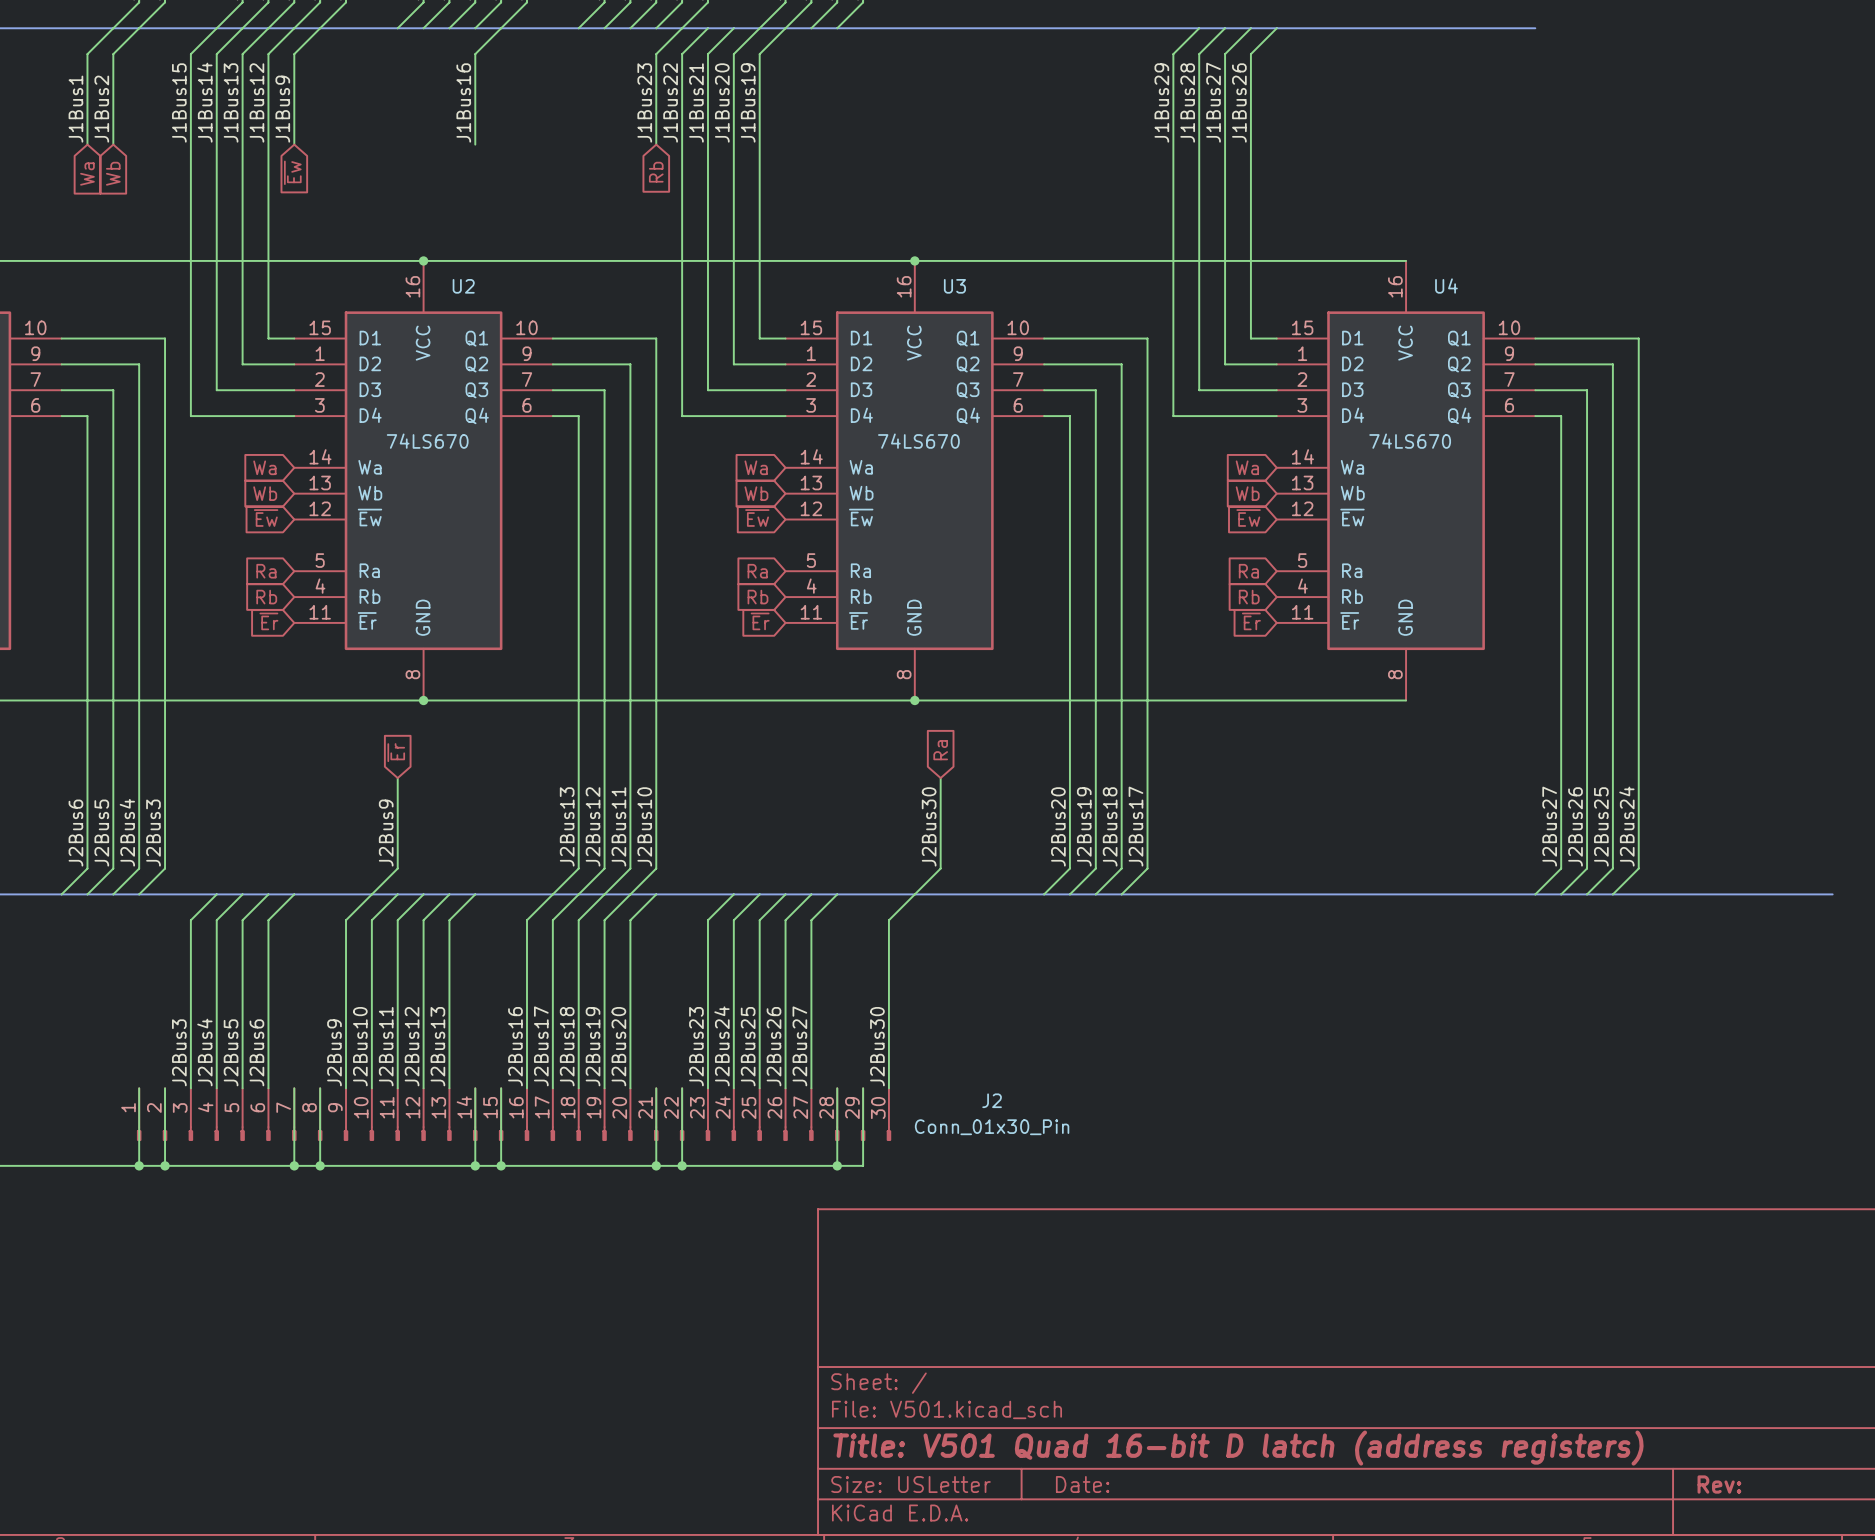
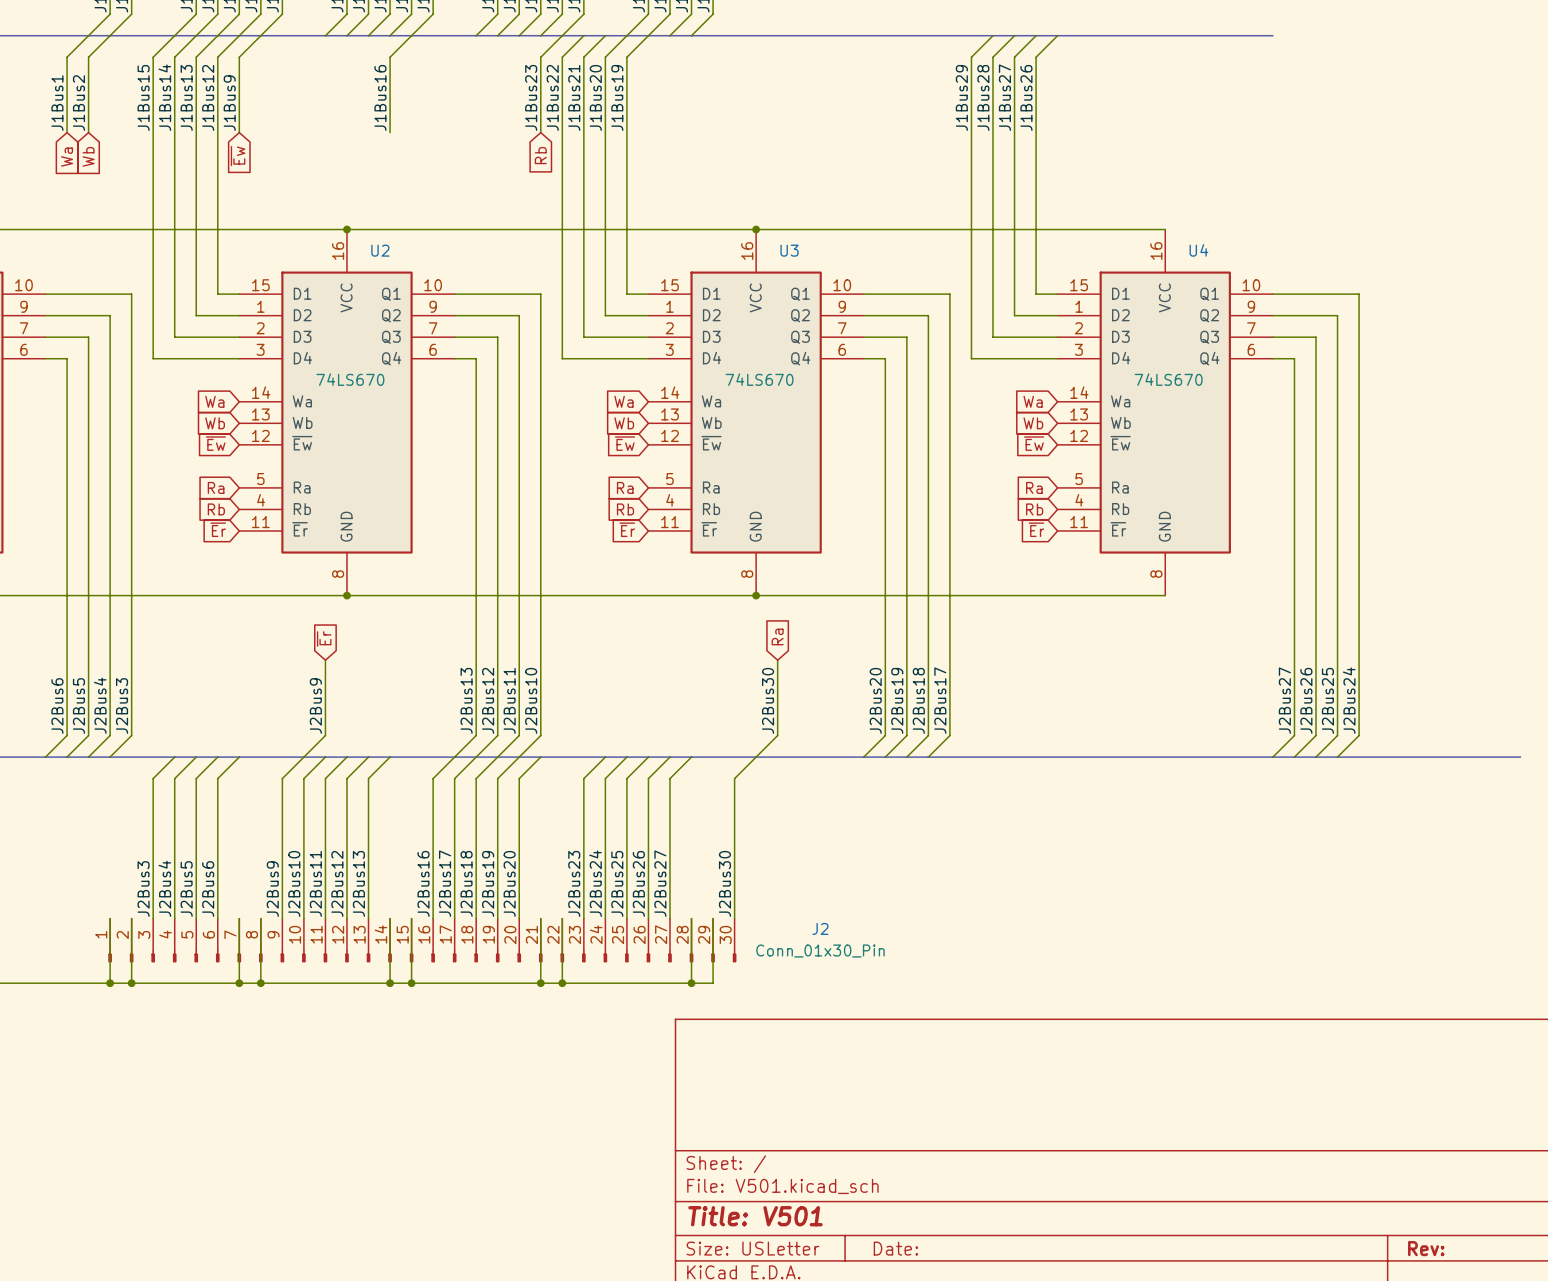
title block: Title: V501 Quad 16-bit D latch (address registers) (1238, 1448) -> Title: V501 (755, 1216)

